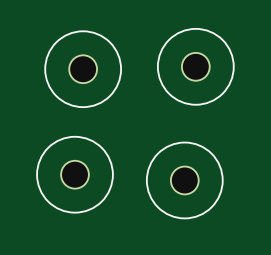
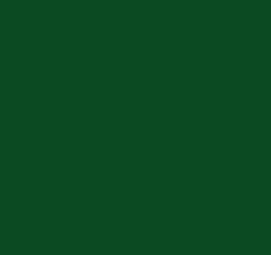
part: (195, 66) -> none
part: (83, 69) -> none
part: (74, 174) -> none
part: (184, 180) -> none

